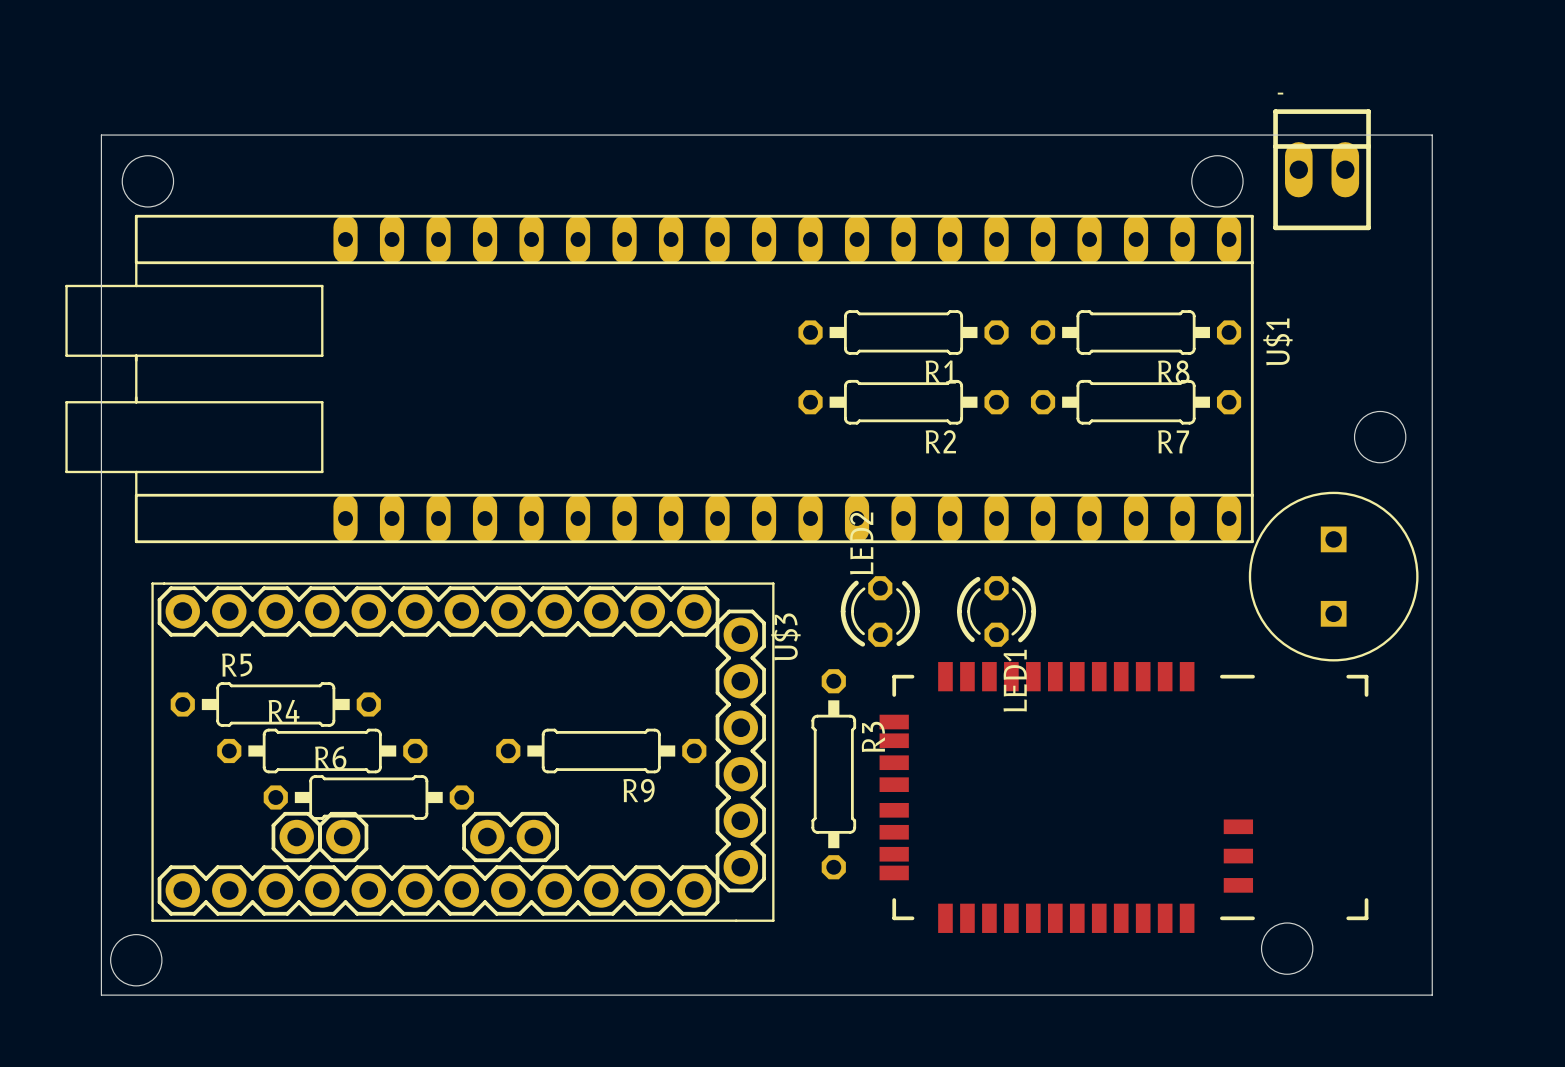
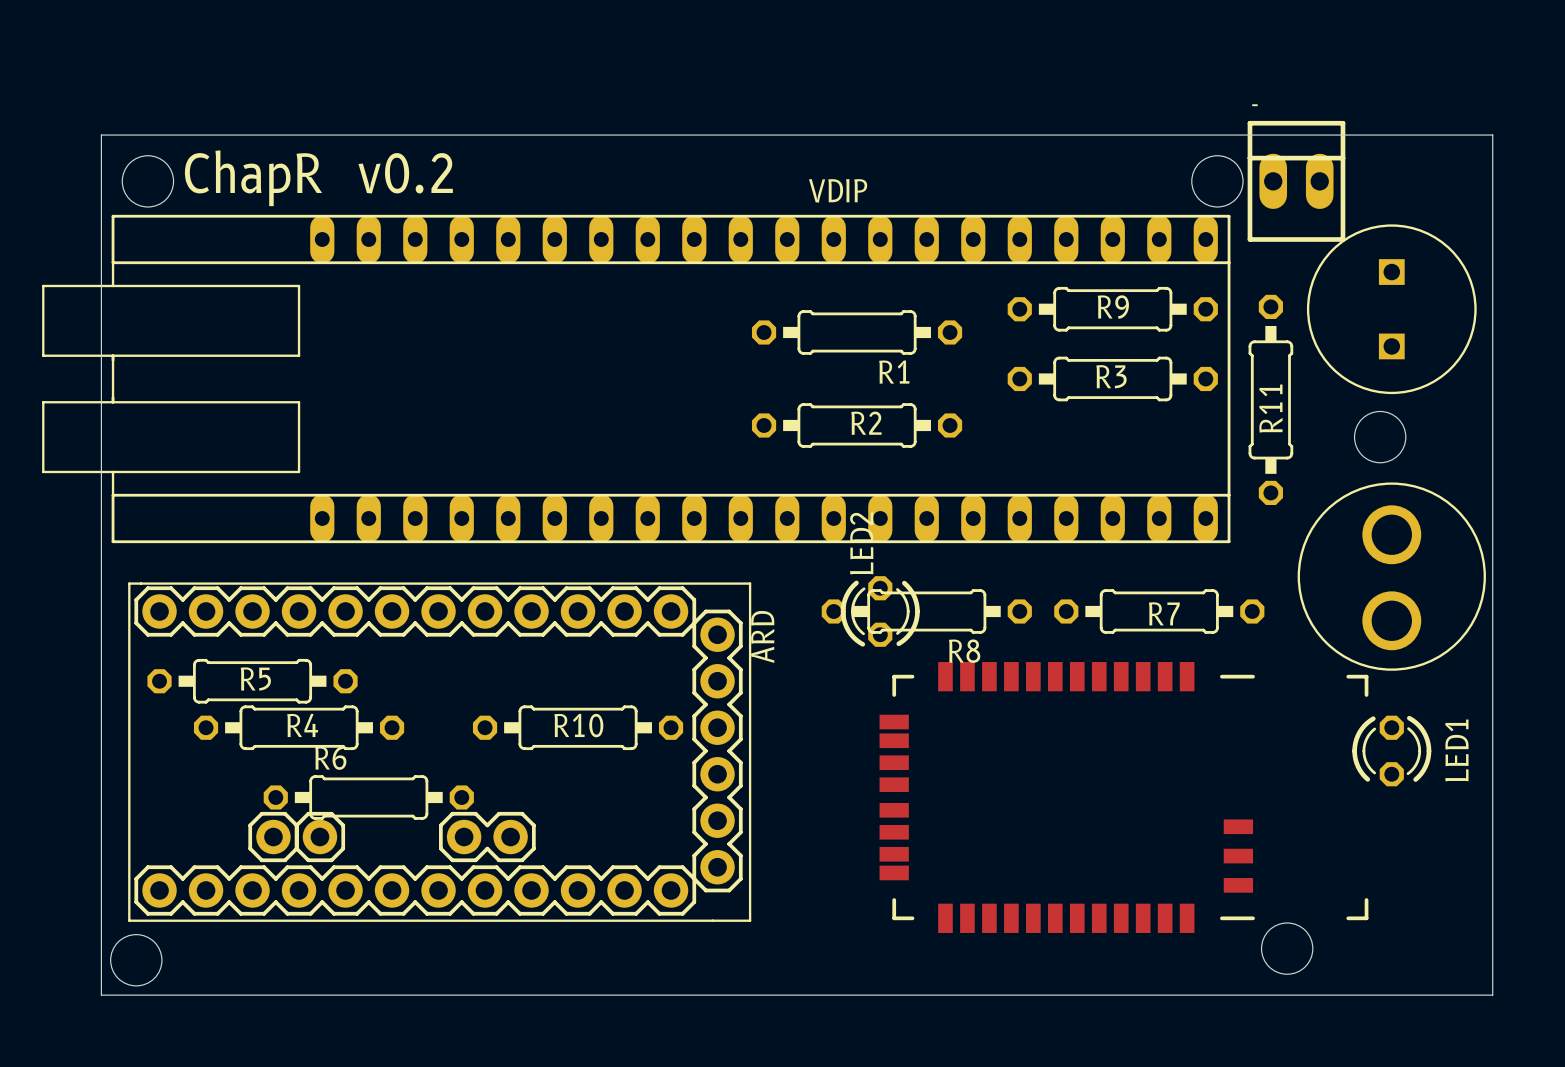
board edge: (1432, 135) (1432, 995) -> (1432, 135) (1492, 135) (1492, 995) (1432, 995)
part position: (1322, 169) -> (1296, 181)
text: none -> ChapR v0.2 (318, 178)
R1 position: (903, 332) -> (857, 332)
R8 position: (1136, 332) -> (926, 611)
VDIP: none -> (636, 378)
U$1: (659, 378) -> none
R11: none -> (1270, 399)
R2 position: (903, 402) -> (857, 425)
R7 position: (1136, 402) -> (1159, 611)
R2 name position: R2 (940, 441) -> R2 (866, 423)
R7 name position: R7 (1173, 441) -> R7 (1164, 613)
part position: (1333, 576) -> (1391, 309)
part: none -> (1391, 576)
LED1 position: (996, 611) -> (1391, 750)
R5 name position: R5 (237, 665) -> R5 (255, 678)
LED1 name position: LED1 (1015, 680) -> LED1 (1456, 750)
R5 position: (275, 704) -> (252, 681)
R4 name position: R4 (284, 711) -> R4 (302, 725)
R10: none -> (578, 727)
R3 name position: R3 (873, 736) -> R3 (1111, 376)
R4 position: (322, 750) -> (299, 727)
R9 position: (601, 750) -> (1112, 309)
ARD: none -> (439, 752)
U$3: (462, 752) -> none
R3 rotation: 0° (833, 774) -> 90° clockwise (1112, 378)
R3 position: (833, 774) -> (1112, 378)
R9 name position: R9 (639, 790) -> R9 (1113, 307)

